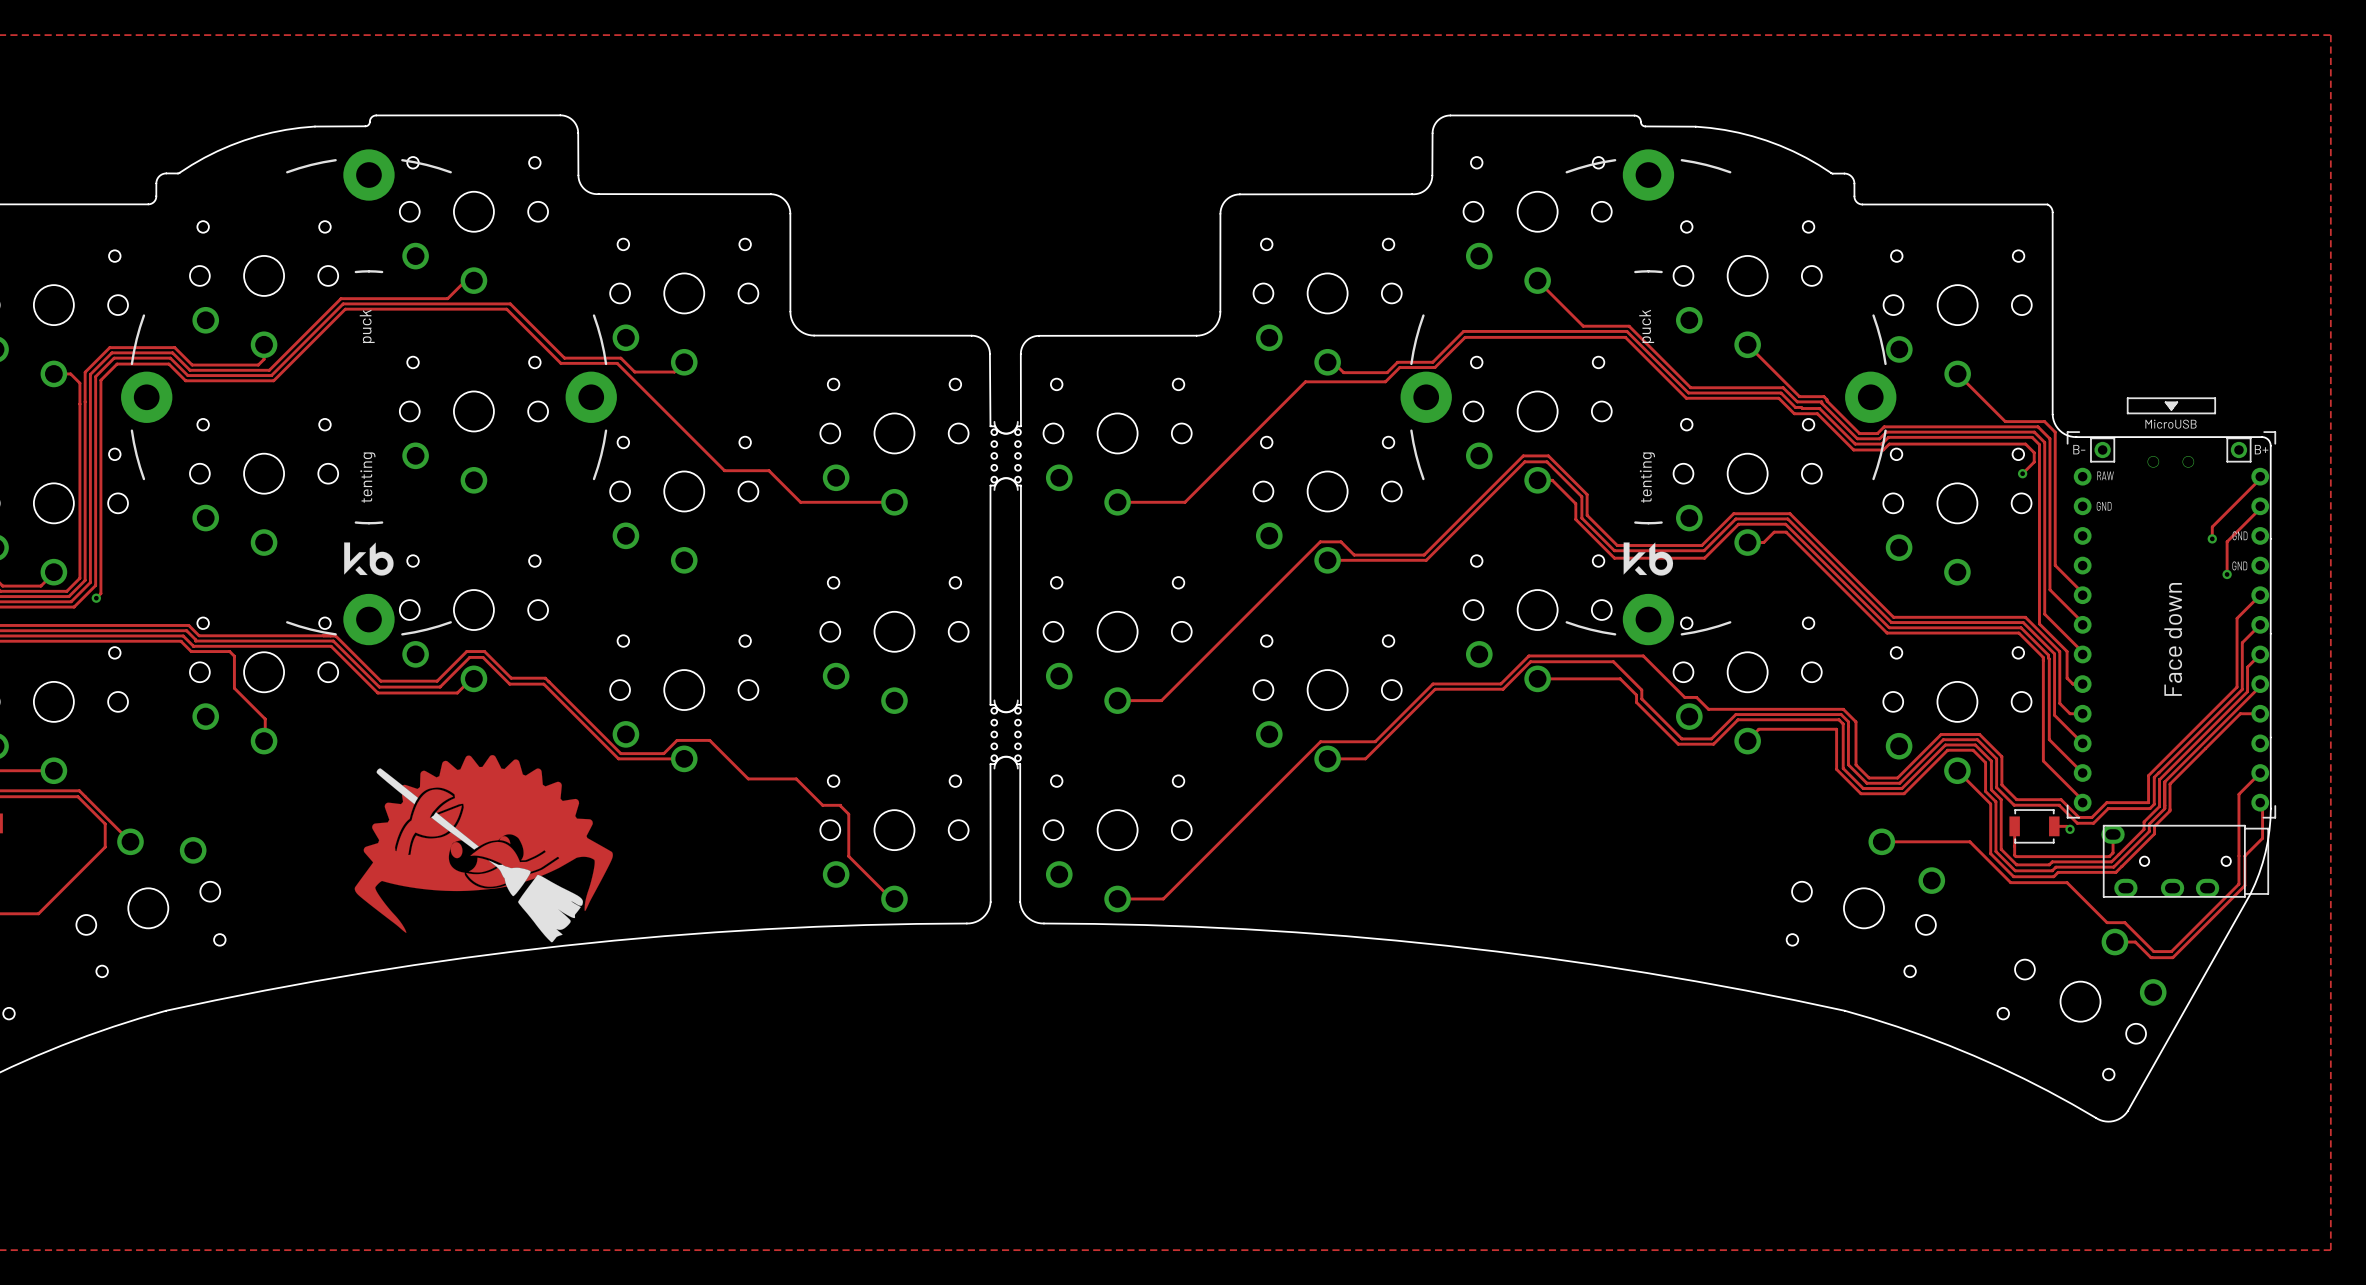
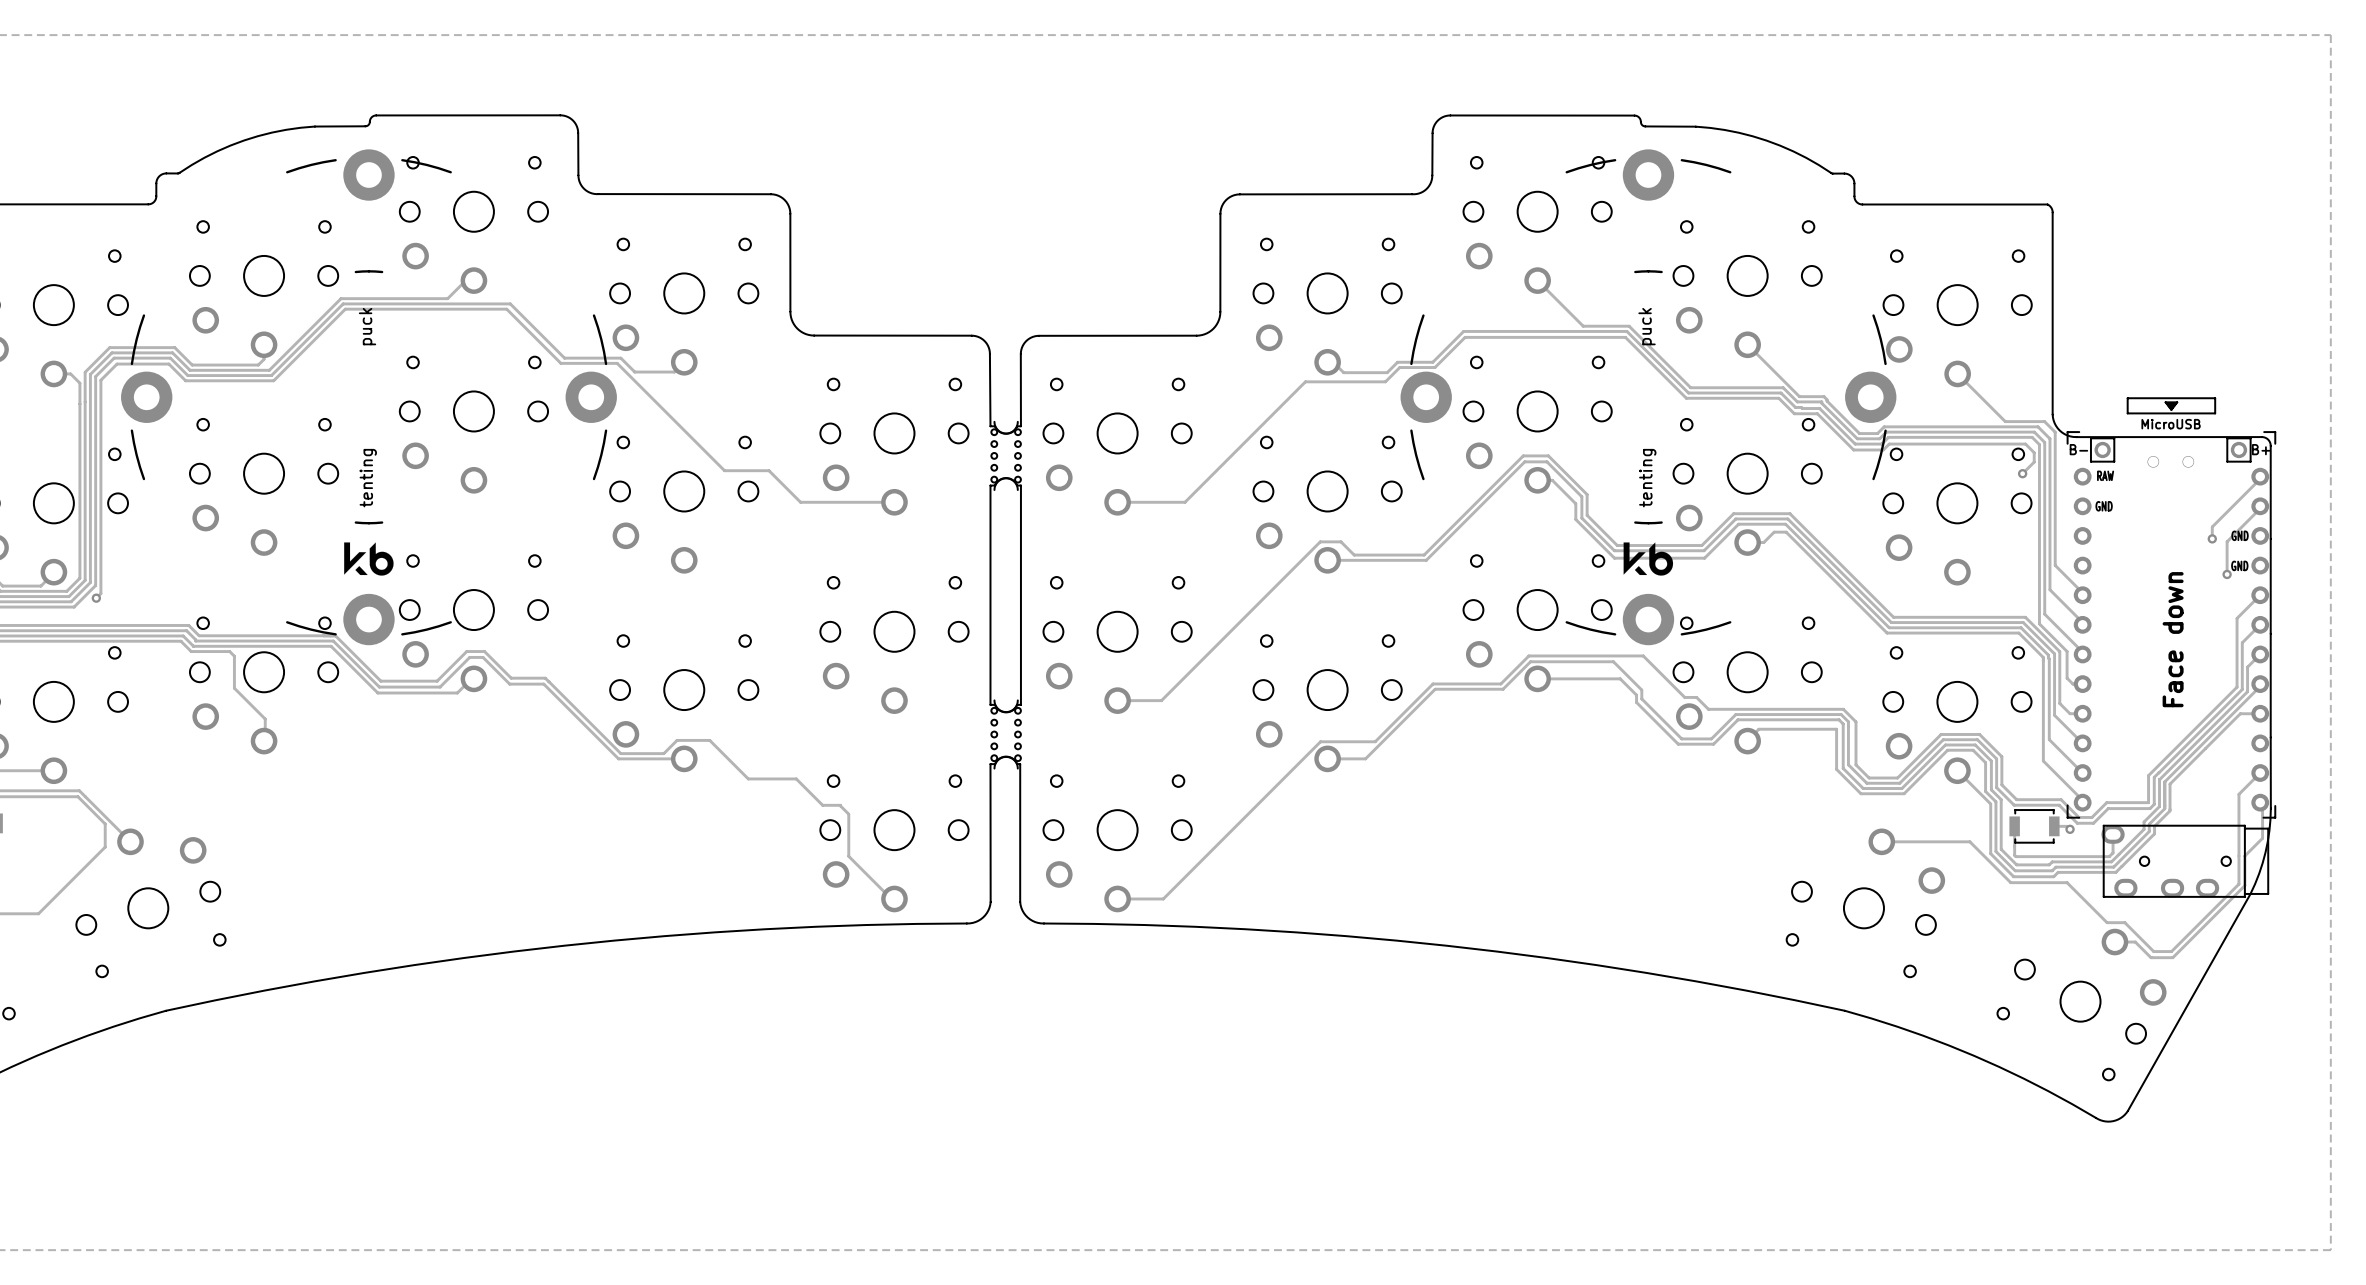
drawing: [354, 755, 613, 943] -> none

